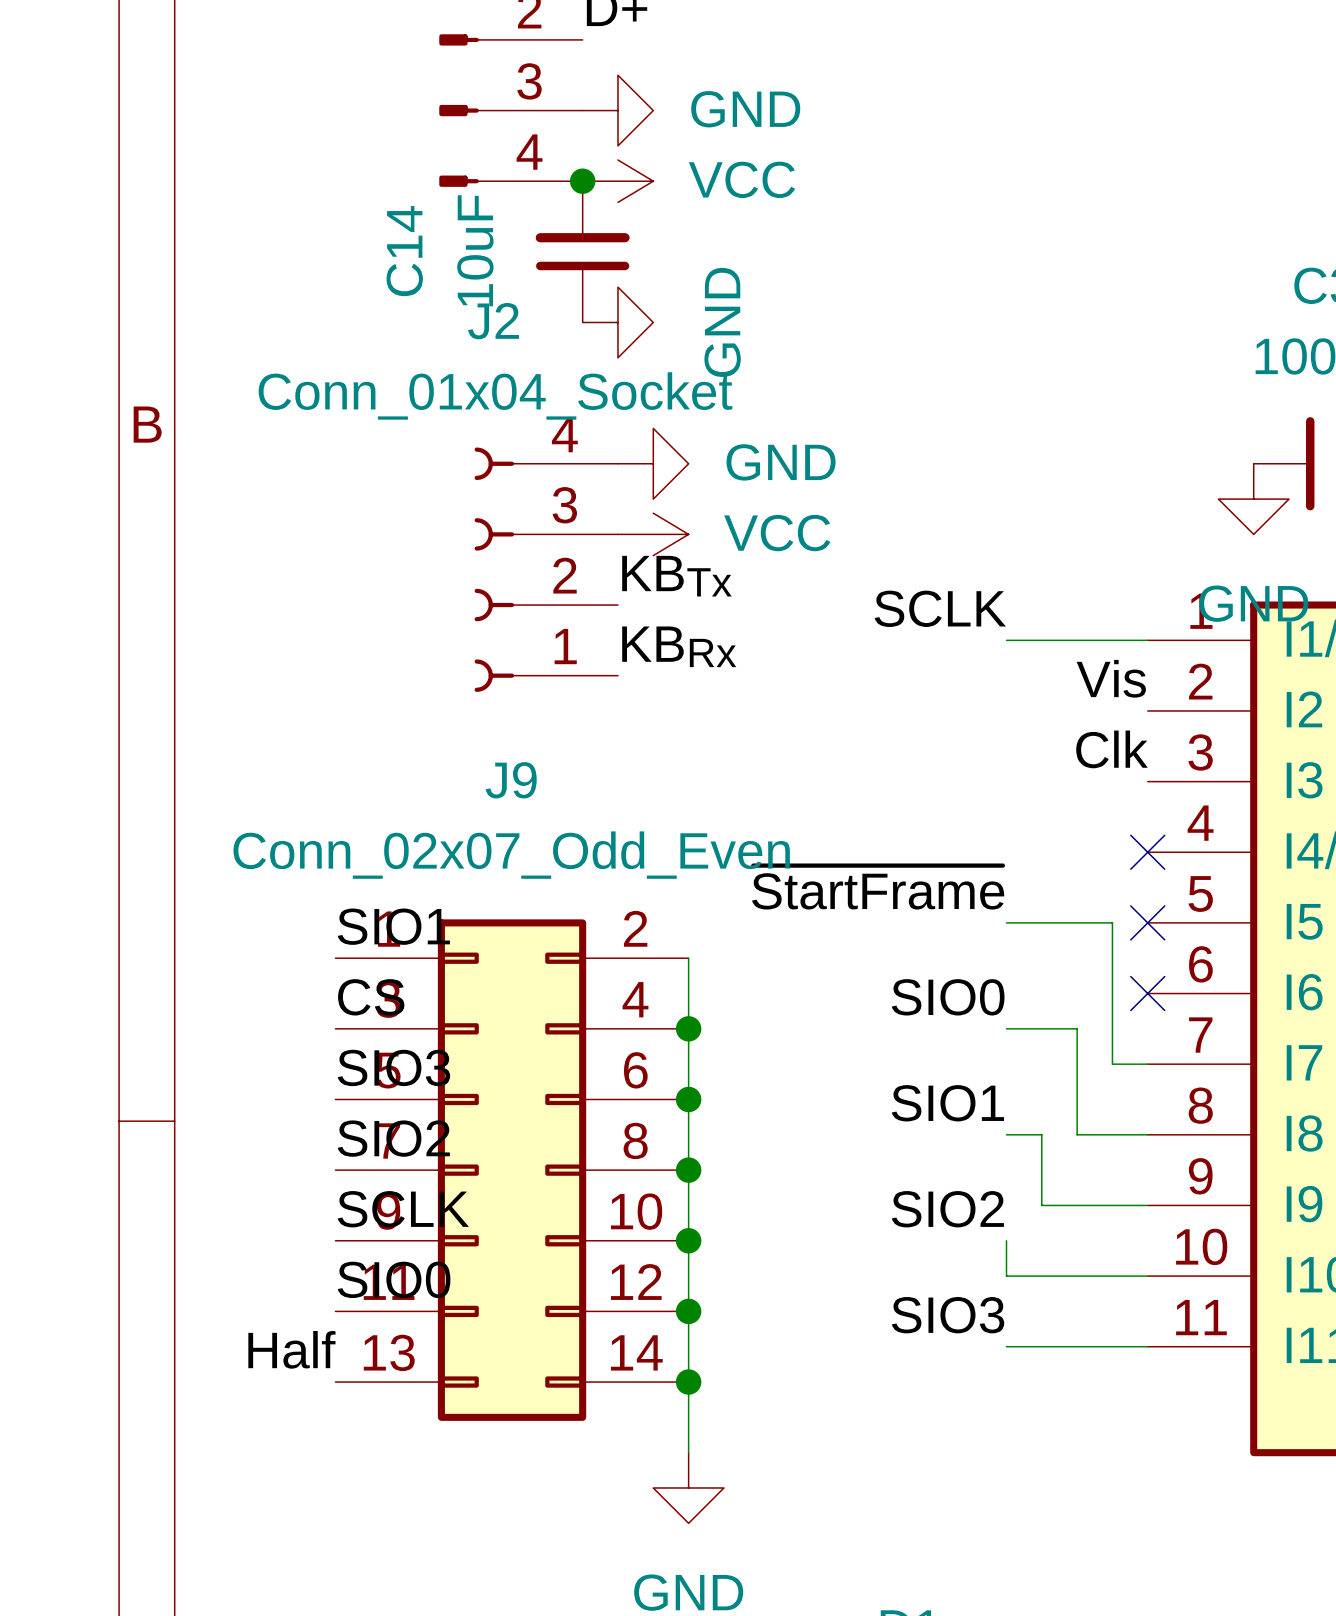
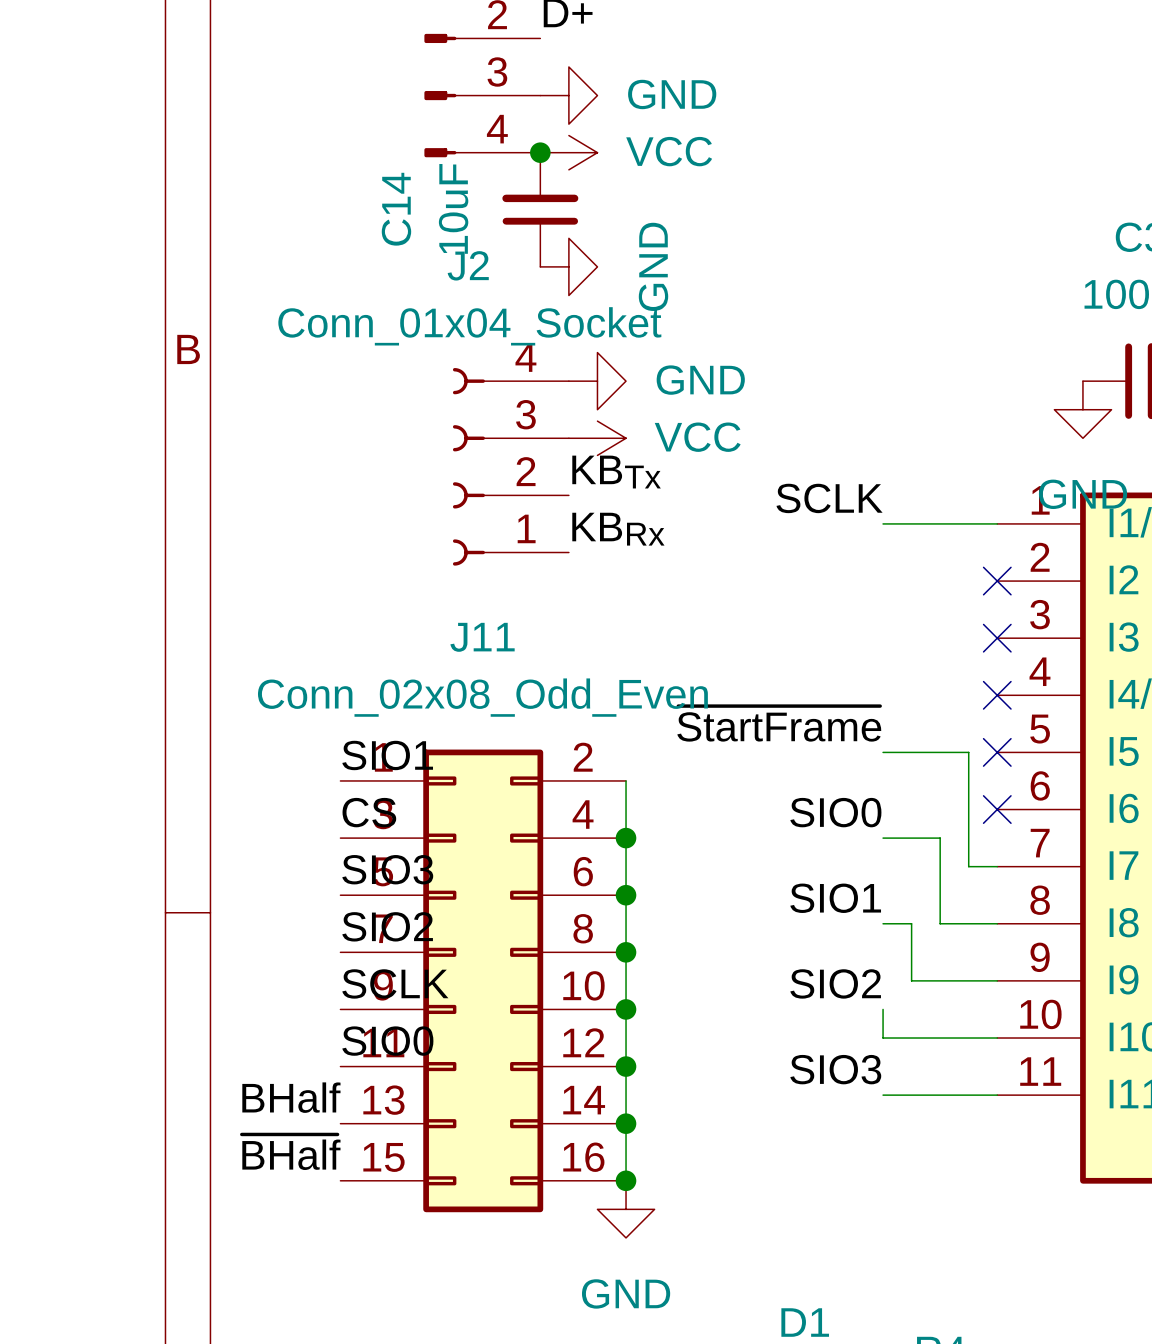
label: Vis (1111, 678) -> none
no-connect mark: none -> (997, 581)
label: Clk (1112, 749) -> none
no-connect mark: none -> (997, 638)
J9: Conn_02x07_Odd_Even (512, 1170) -> none
J11: none -> Conn_02x08_Odd_Even (483, 980)
label: Half (291, 1349) -> BHalf (291, 1097)
label: none -> ~{BHalf} (291, 1152)
junction: none -> (626, 1180)

